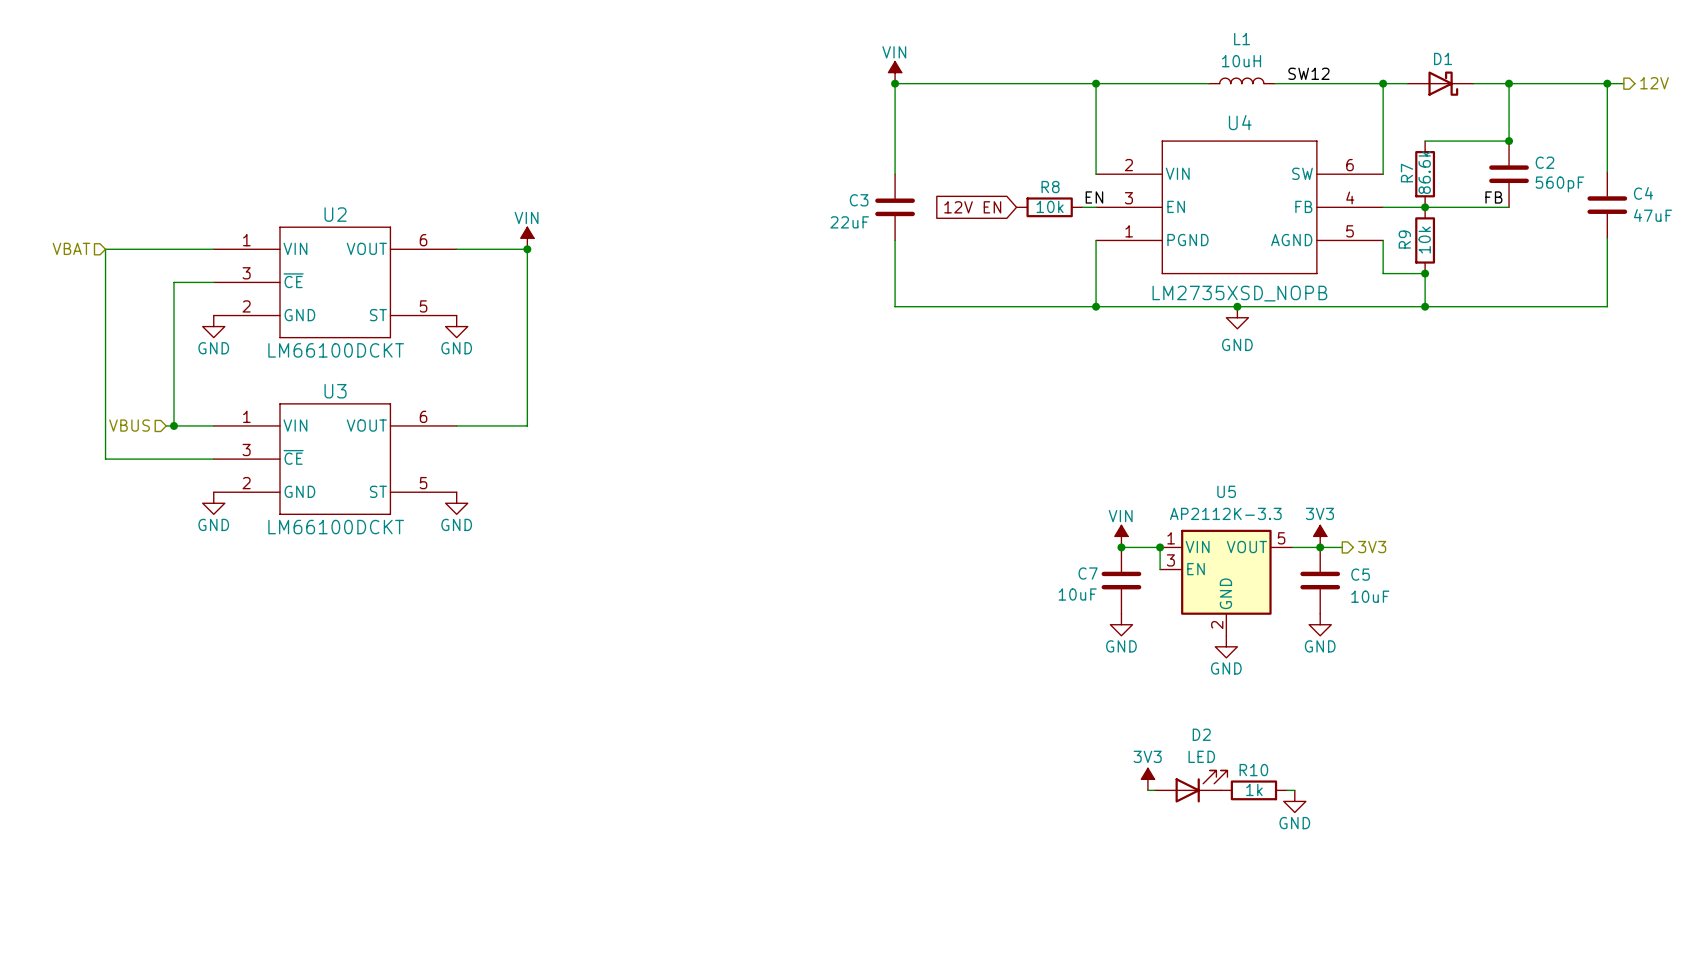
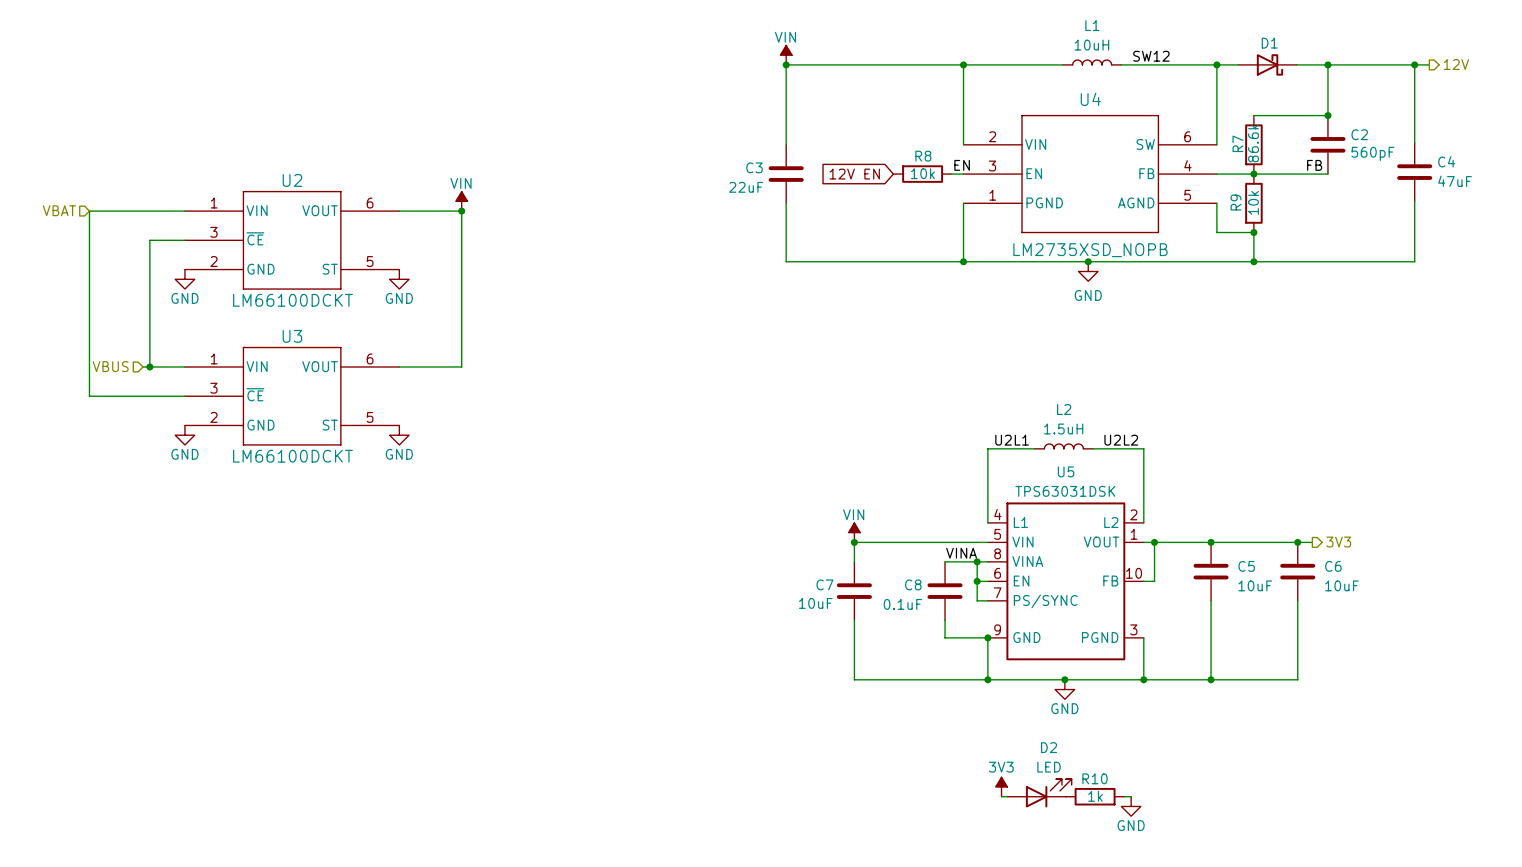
U5 name position: U5 (1226, 491) -> U5 (1066, 471)
label: none -> U2L1 (1012, 440)
label: none -> U2L2 (1121, 440)
U5 value: AP2112K-3.3 (1225, 513) -> TPS63031DSK (1065, 491)
L2: none -> 1.5uH (1063, 446)
wire: none -> (1034, 448) (987, 448) (987, 522)
wire: none -> (1093, 448) (1143, 448) (1143, 522)
U5 symbol: [1160, 529, 1293, 636] -> [987, 502, 1144, 661]
power symbol position: VIN (1121, 536) -> VIN (854, 532)
power symbol: 3V3 (1320, 536) -> none
wire: (1121, 547) (1160, 547) (1160, 569) -> none
junction: (1121, 547) -> none
junction: (1160, 547) -> none
wire: (1292, 547) (1342, 547) -> none
junction: (1320, 547) -> none
hierarchical label position: 3V3 (1372, 547) -> 3V3 (1338, 542)
C7 position: (1121, 580) -> (854, 591)
C5 position: (1320, 580) -> (1211, 571)
junction: none -> (854, 542)
power symbol: GND (1121, 624) -> none
wire: none -> (987, 542) (854, 542) (854, 561)
wire: none -> (1143, 542) (1312, 542)
wire: none -> (1154, 542) (1154, 581) (1143, 581)
junction: none -> (1154, 542)
power symbol: GND (1320, 624) -> none
junction: none -> (1211, 542)
junction: none -> (1297, 542)
label: none -> VINA (961, 553)
wire: none -> (945, 561) (987, 561)
wire: none -> (977, 561) (977, 600) (987, 600)
junction: none -> (977, 561)
power symbol: GND (1226, 646) -> none
C6: none -> 10uF (1297, 571)
wire: none -> (977, 581) (987, 581)
junction: none -> (977, 581)
C8: none -> 0.1uF (945, 591)
wire: none -> (1211, 600) (1211, 679)
wire: none -> (1297, 600) (1297, 679) (854, 679) (854, 620)
wire: none -> (945, 620) (945, 637) (987, 637) (987, 679)
junction: none -> (987, 637)
wire: none -> (1143, 637) (1143, 679)
power symbol position: 3V3 (1147, 779) -> 3V3 (1001, 786)
junction: none -> (987, 679)
junction: none -> (1064, 679)
junction: none -> (1143, 679)
junction: none -> (1211, 679)
D2 position: (1191, 786) -> (1039, 793)
wire: (1147, 790) (1154, 790) -> (1001, 796) (1007, 796)
R10 position: (1253, 790) -> (1095, 796)
wire: (1287, 790) (1294, 790) -> (1124, 796) (1131, 796)
power symbol: none -> GND (1064, 689)
power symbol: GND (1294, 801) -> none
power symbol: none -> GND (1131, 806)

